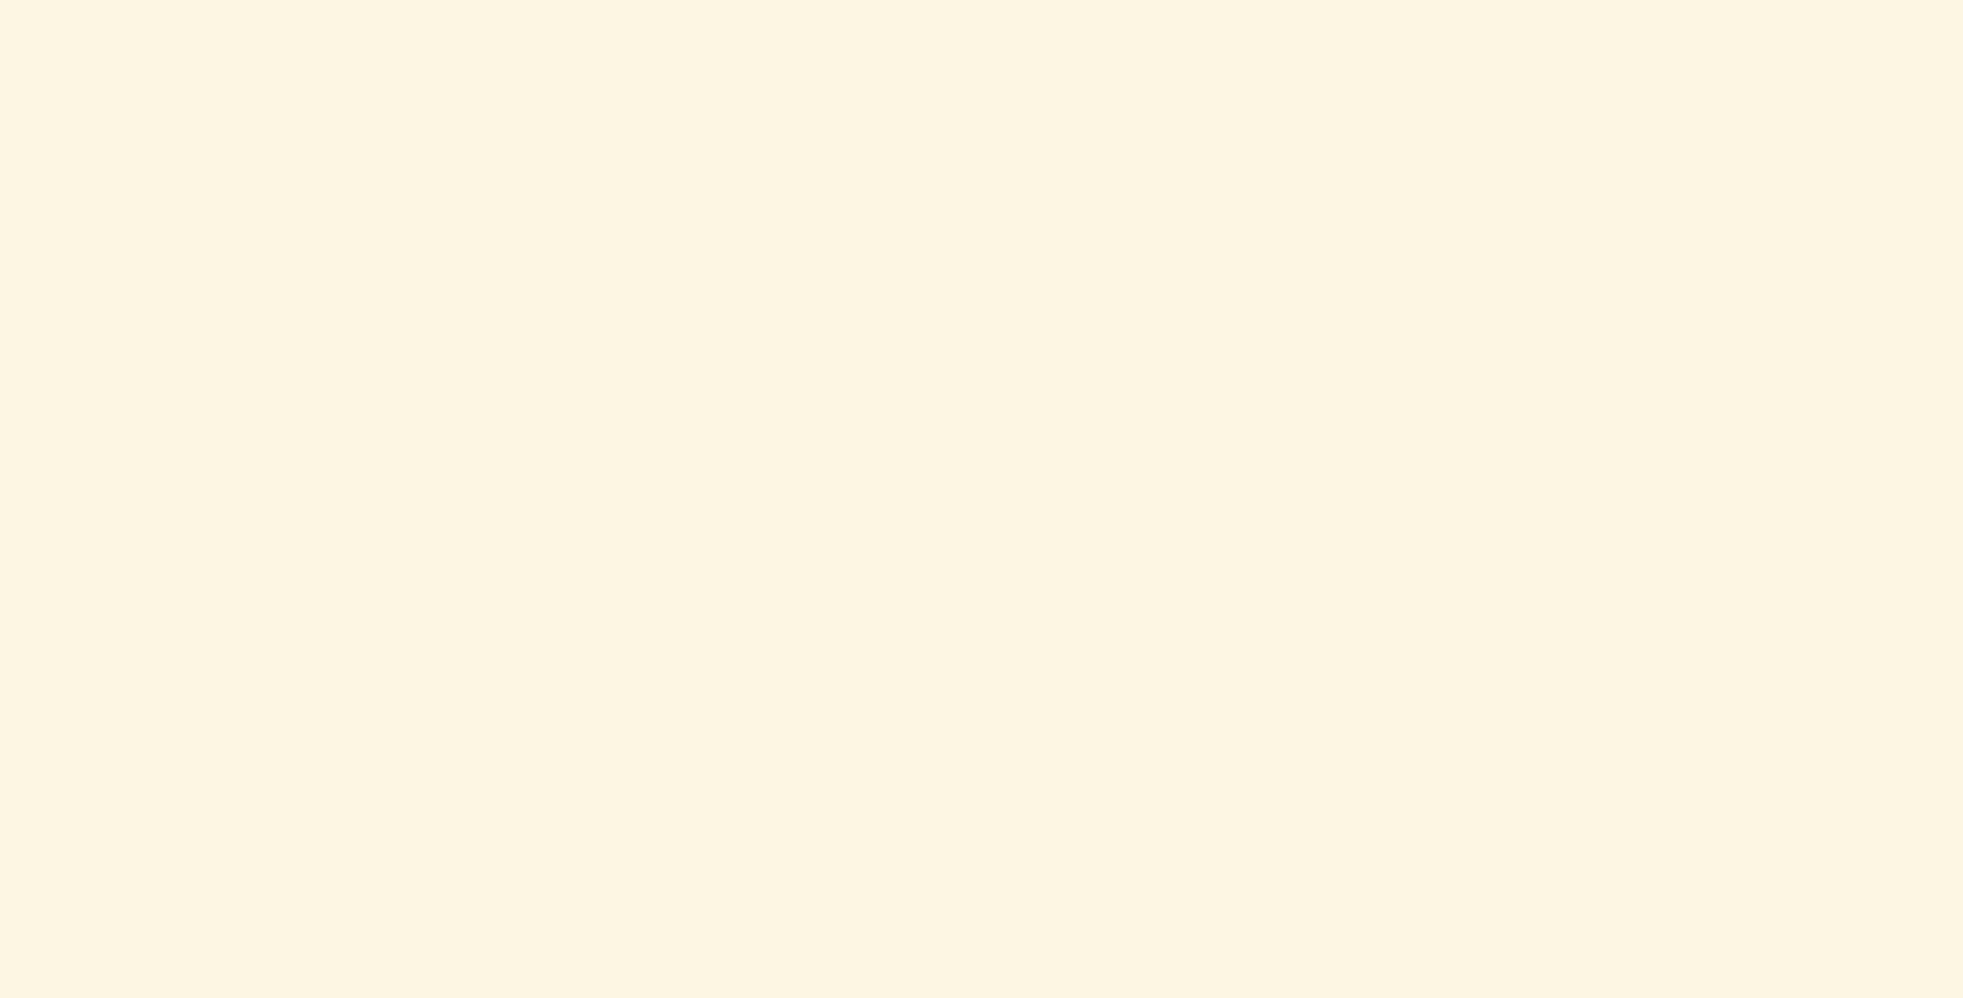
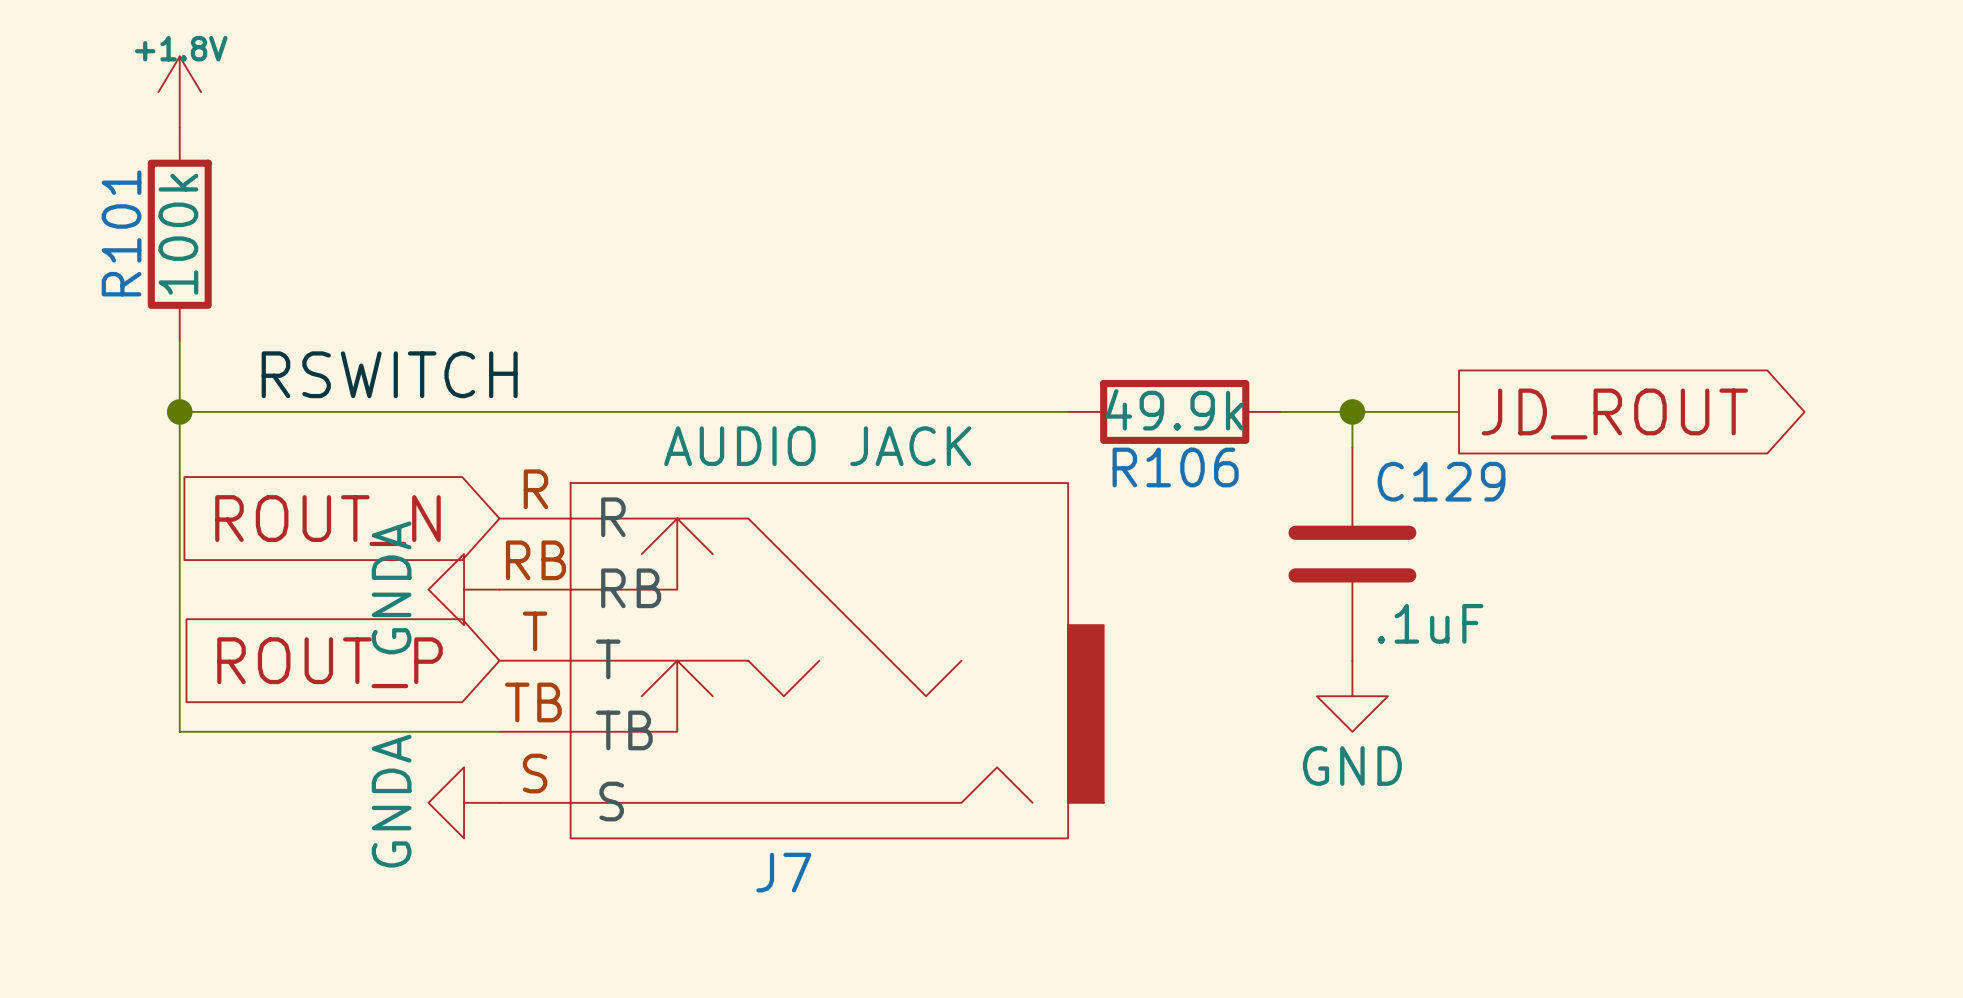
power symbol: none -> +1.8V (179, 92)
R101: none -> 100k (179, 234)
wire: none -> (179, 340) (179, 731) (499, 731)
label: none -> RSWITCH (389, 374)
wire: none -> (179, 411) (1068, 411)
junction: none -> (179, 411)
R106: none -> 49.9k (1174, 411)
wire: none -> (1281, 411) (1459, 411)
wire: none -> (1352, 411) (1352, 447)
junction: none -> (1352, 411)
global label: none -> JD_ROUT (1614, 413)
global label: none -> ROUT_N (327, 520)
C129: none -> .1uF (1352, 554)
power symbol: none -> GNDA (464, 589)
J7: none -> AUDIO JACK (801, 660)
global label: none -> ROUT_P (329, 662)
power symbol: none -> GND (1352, 696)
power symbol: none -> GNDA (464, 802)

